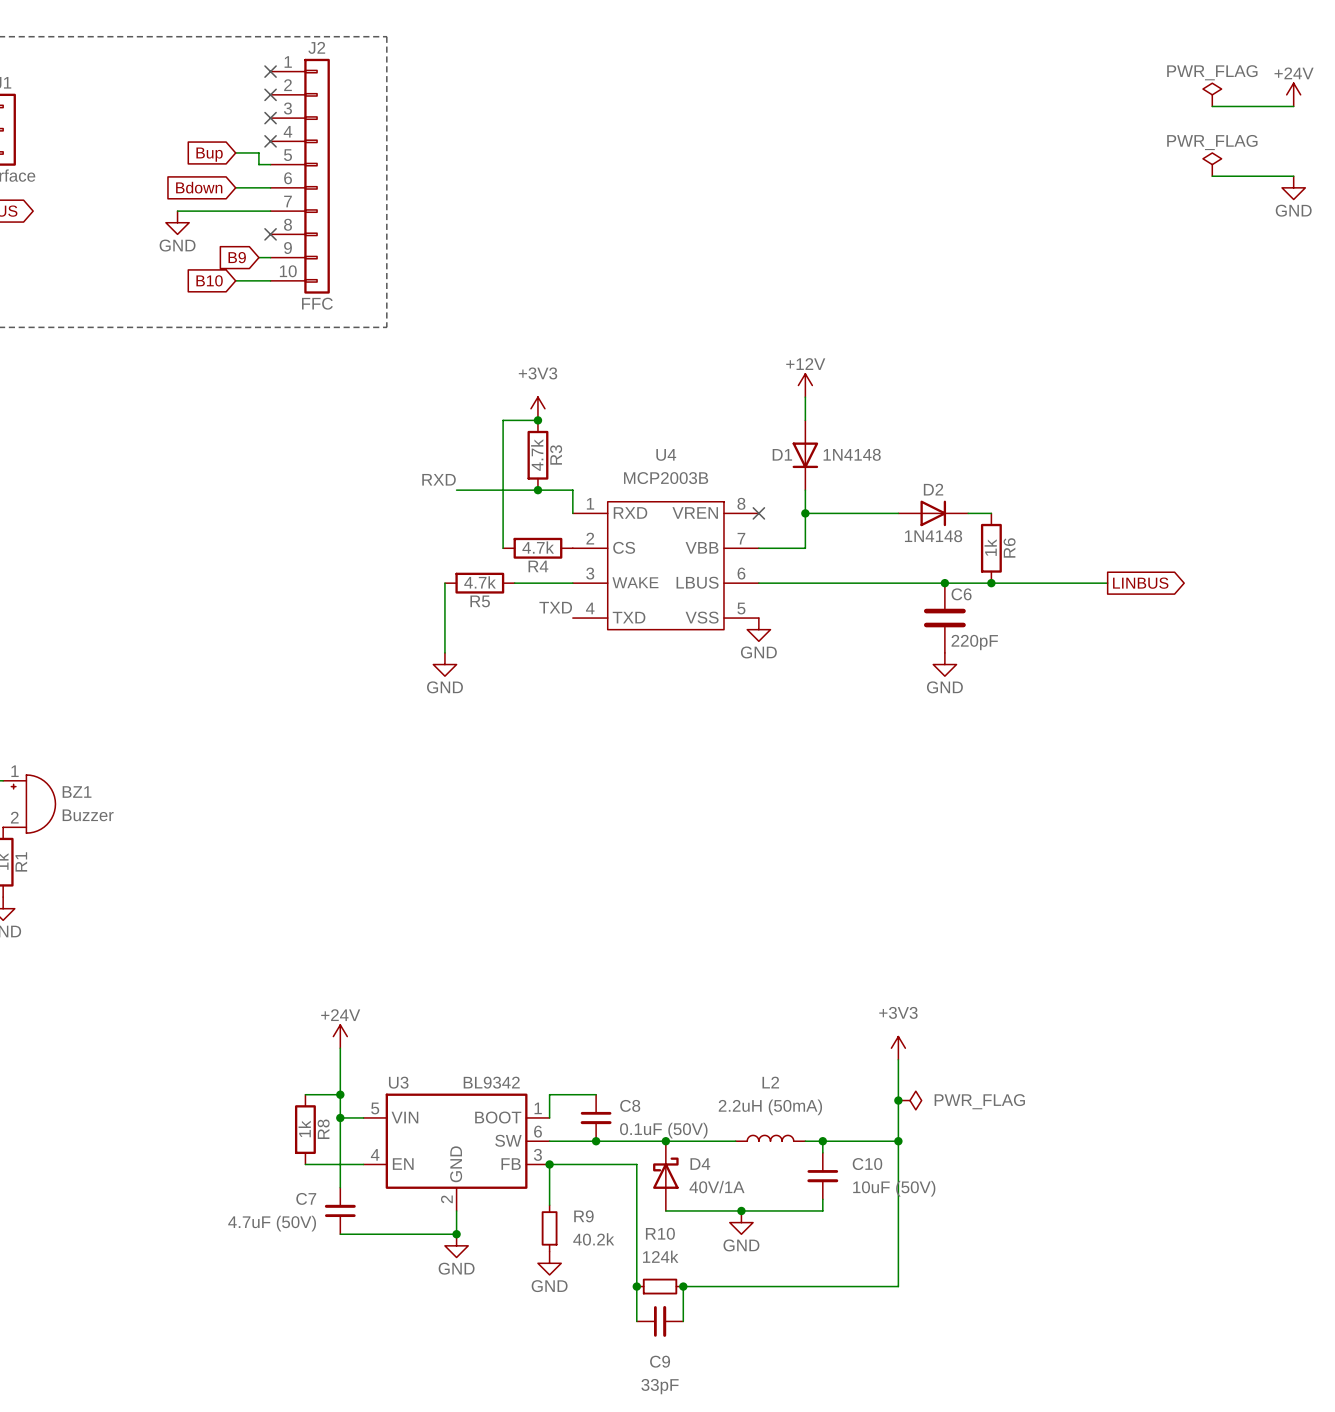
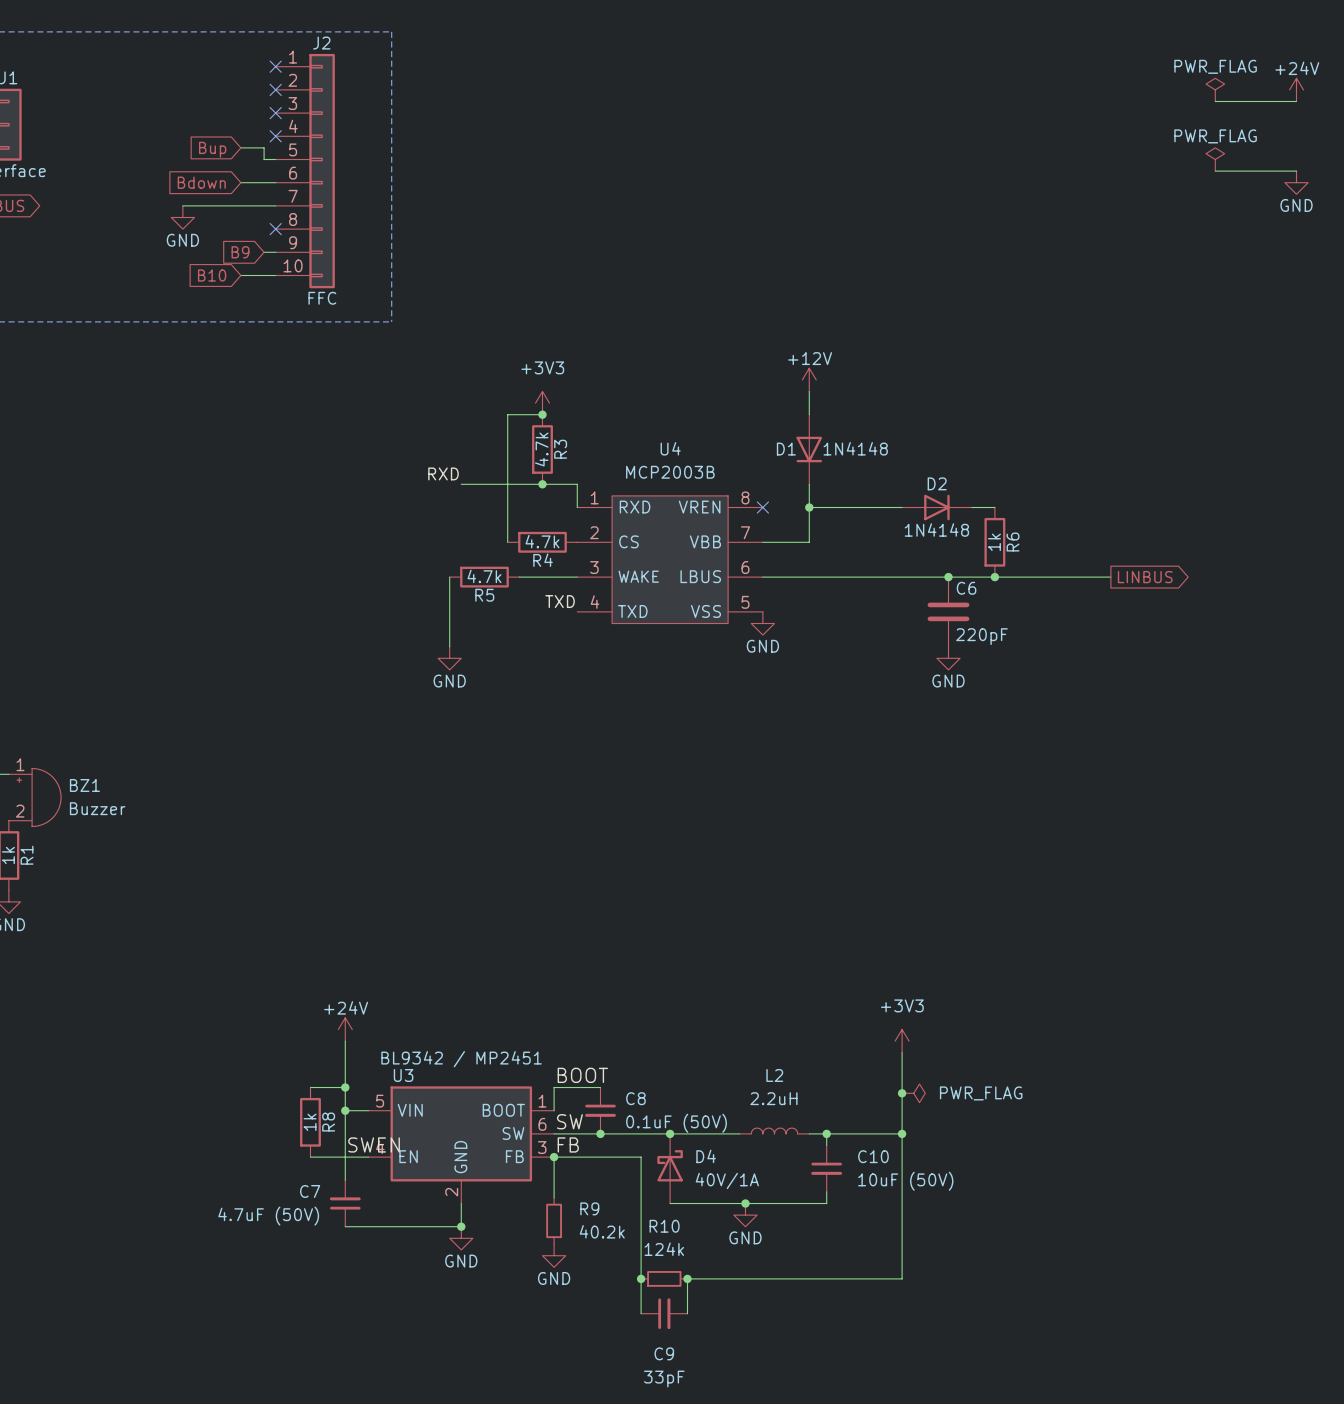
U3 value: BL9342 (491, 1082) -> BL9342 / MP2451 (461, 1059)
label: none -> BOOT (582, 1075)
L2 value: 2.2uH (50mA) (770, 1107) -> 2.2uH (773, 1098)
label: none -> SW (569, 1121)
label: none -> SWEN (374, 1144)
label: none -> FB (568, 1144)

